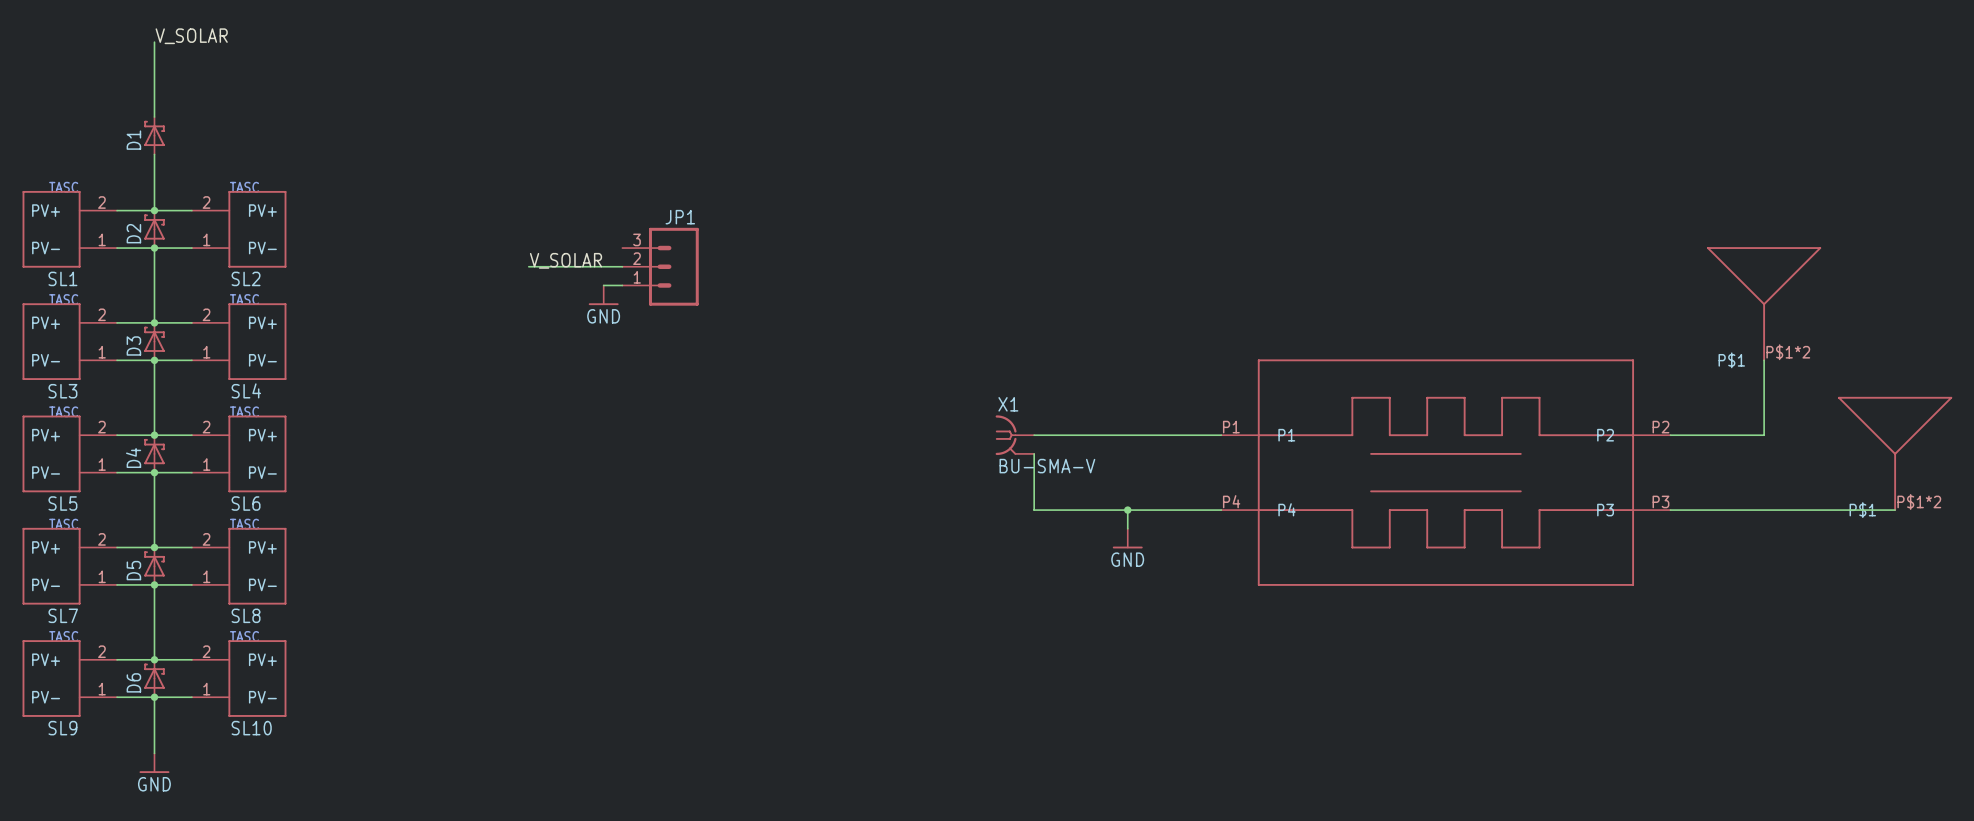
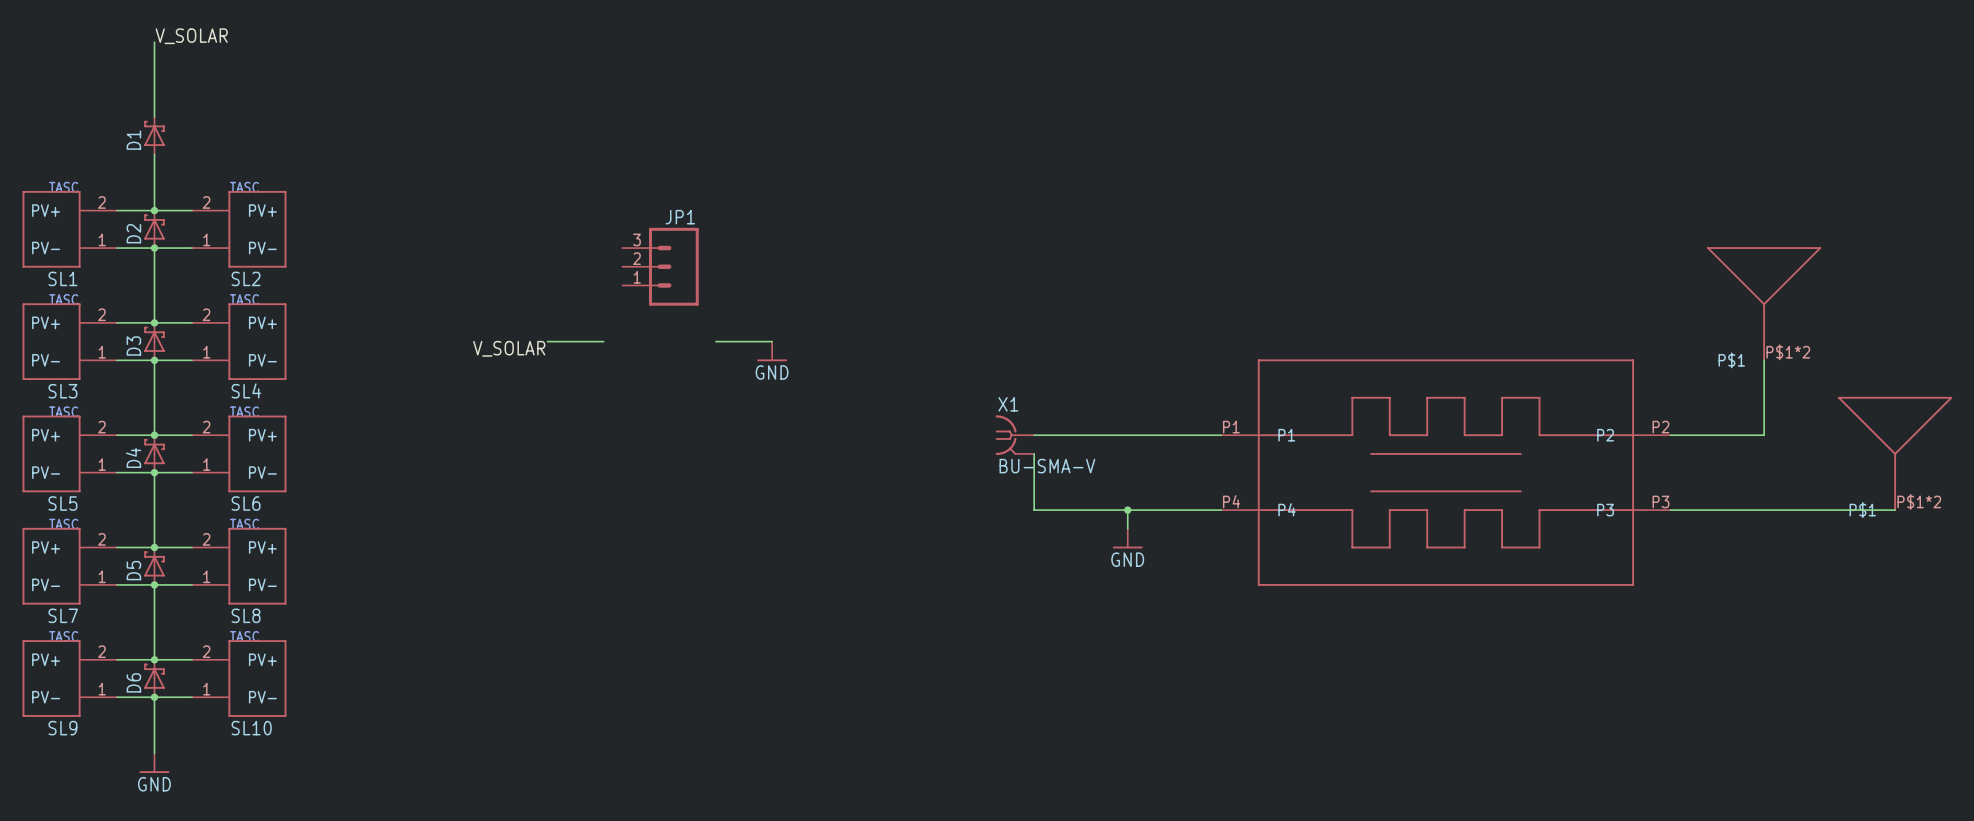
label position: V_SOLAR (566, 260) -> V_SOLAR (509, 348)
wire: (528, 266) (622, 266) -> none
wire: (603, 285) (622, 285) -> none
power symbol position: GND (603, 295) -> GND (772, 351)
wire: none -> (547, 341) (603, 341)
wire: none -> (715, 341) (772, 341)

